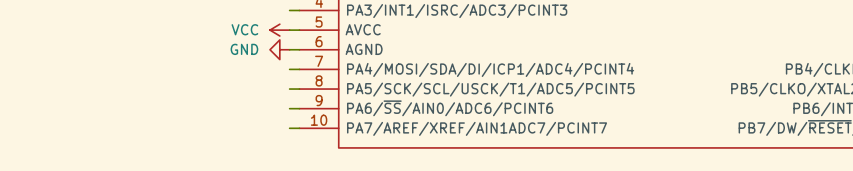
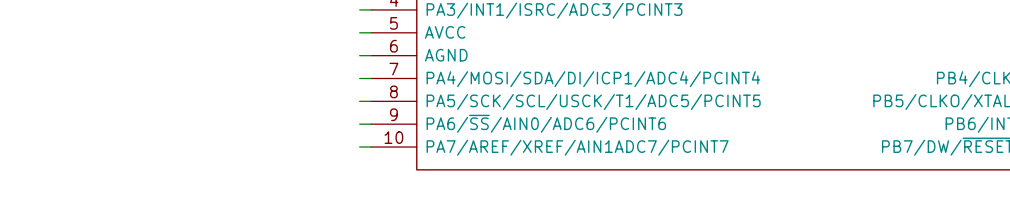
power symbol: VCC (279, 30) -> none
power symbol: GND (279, 49) -> none

